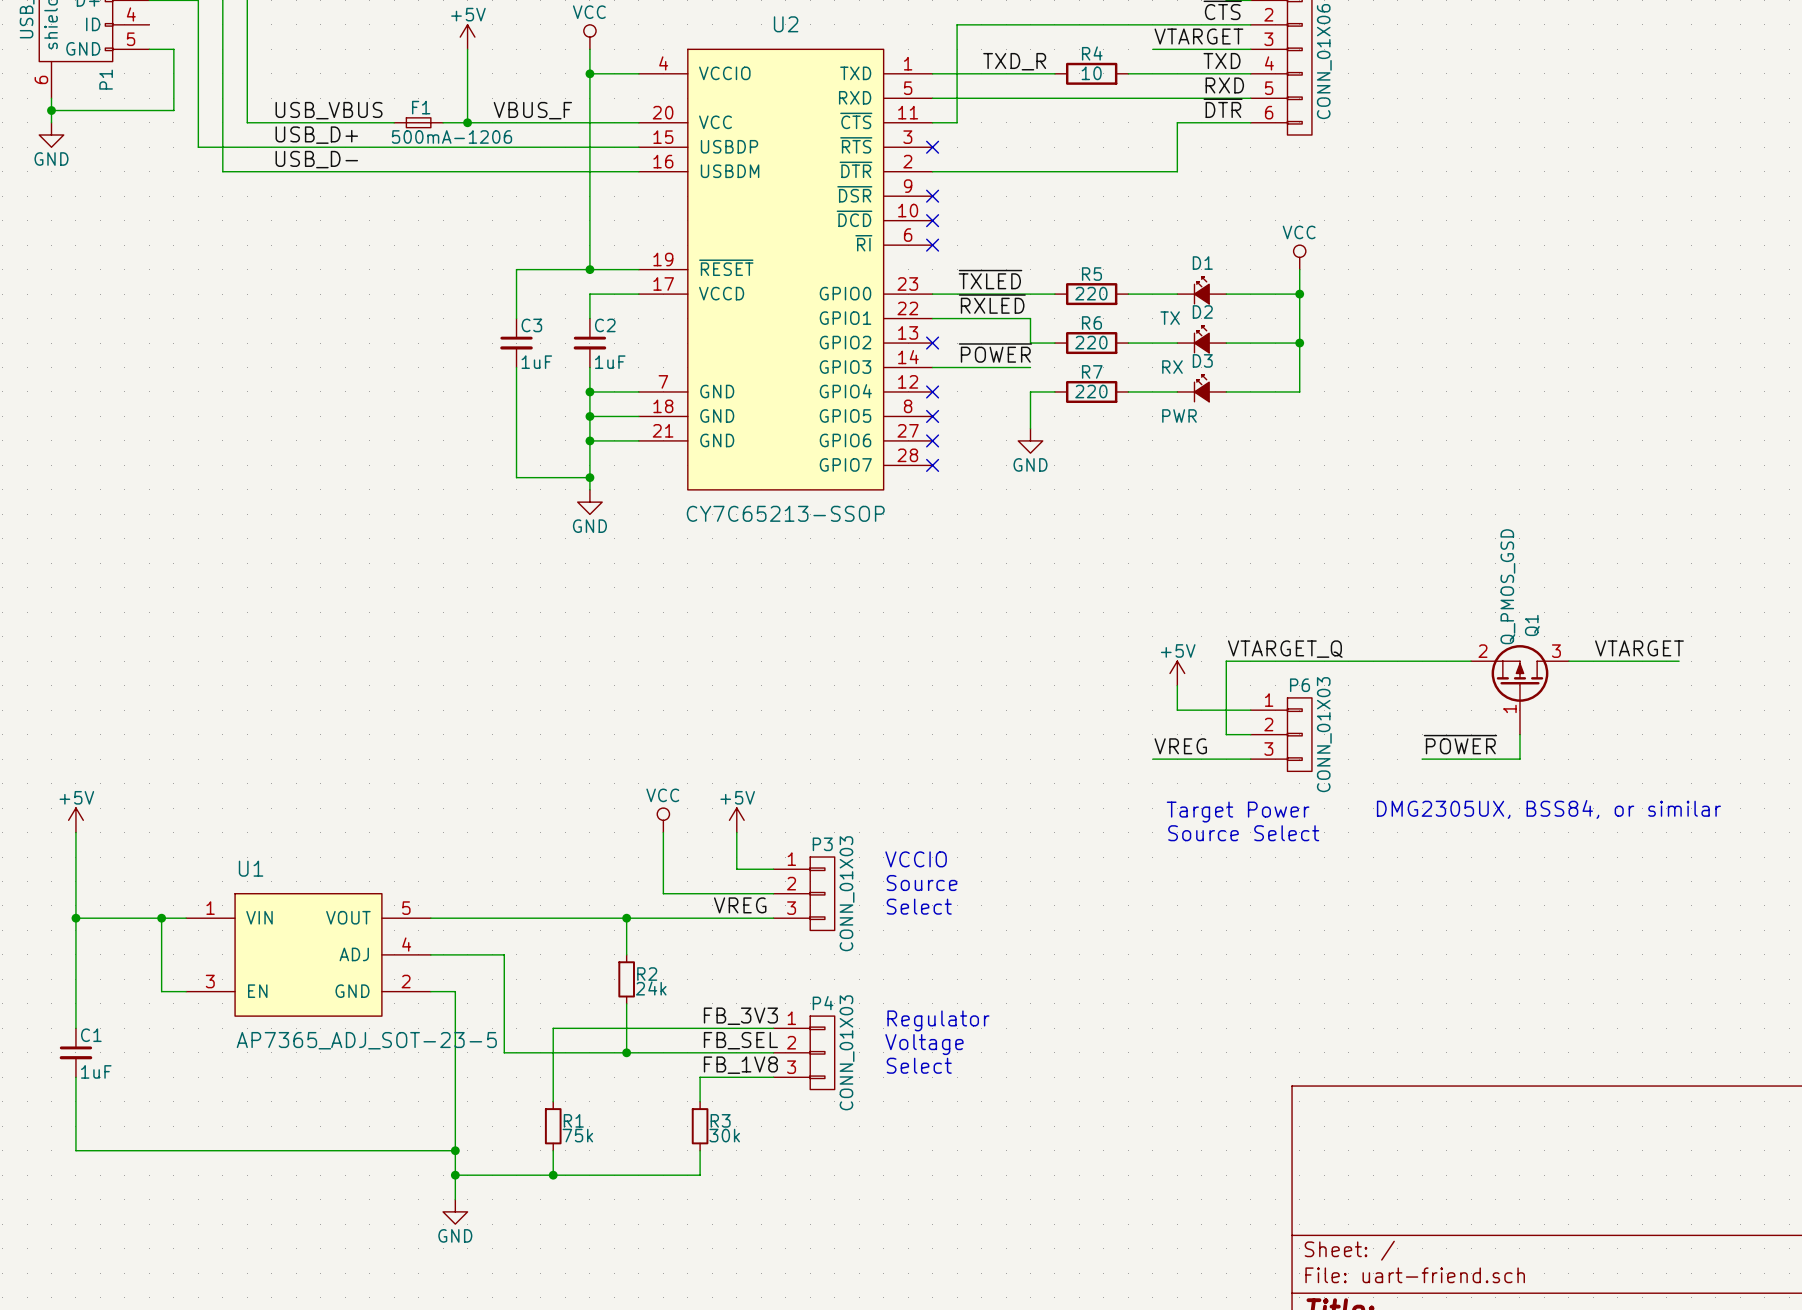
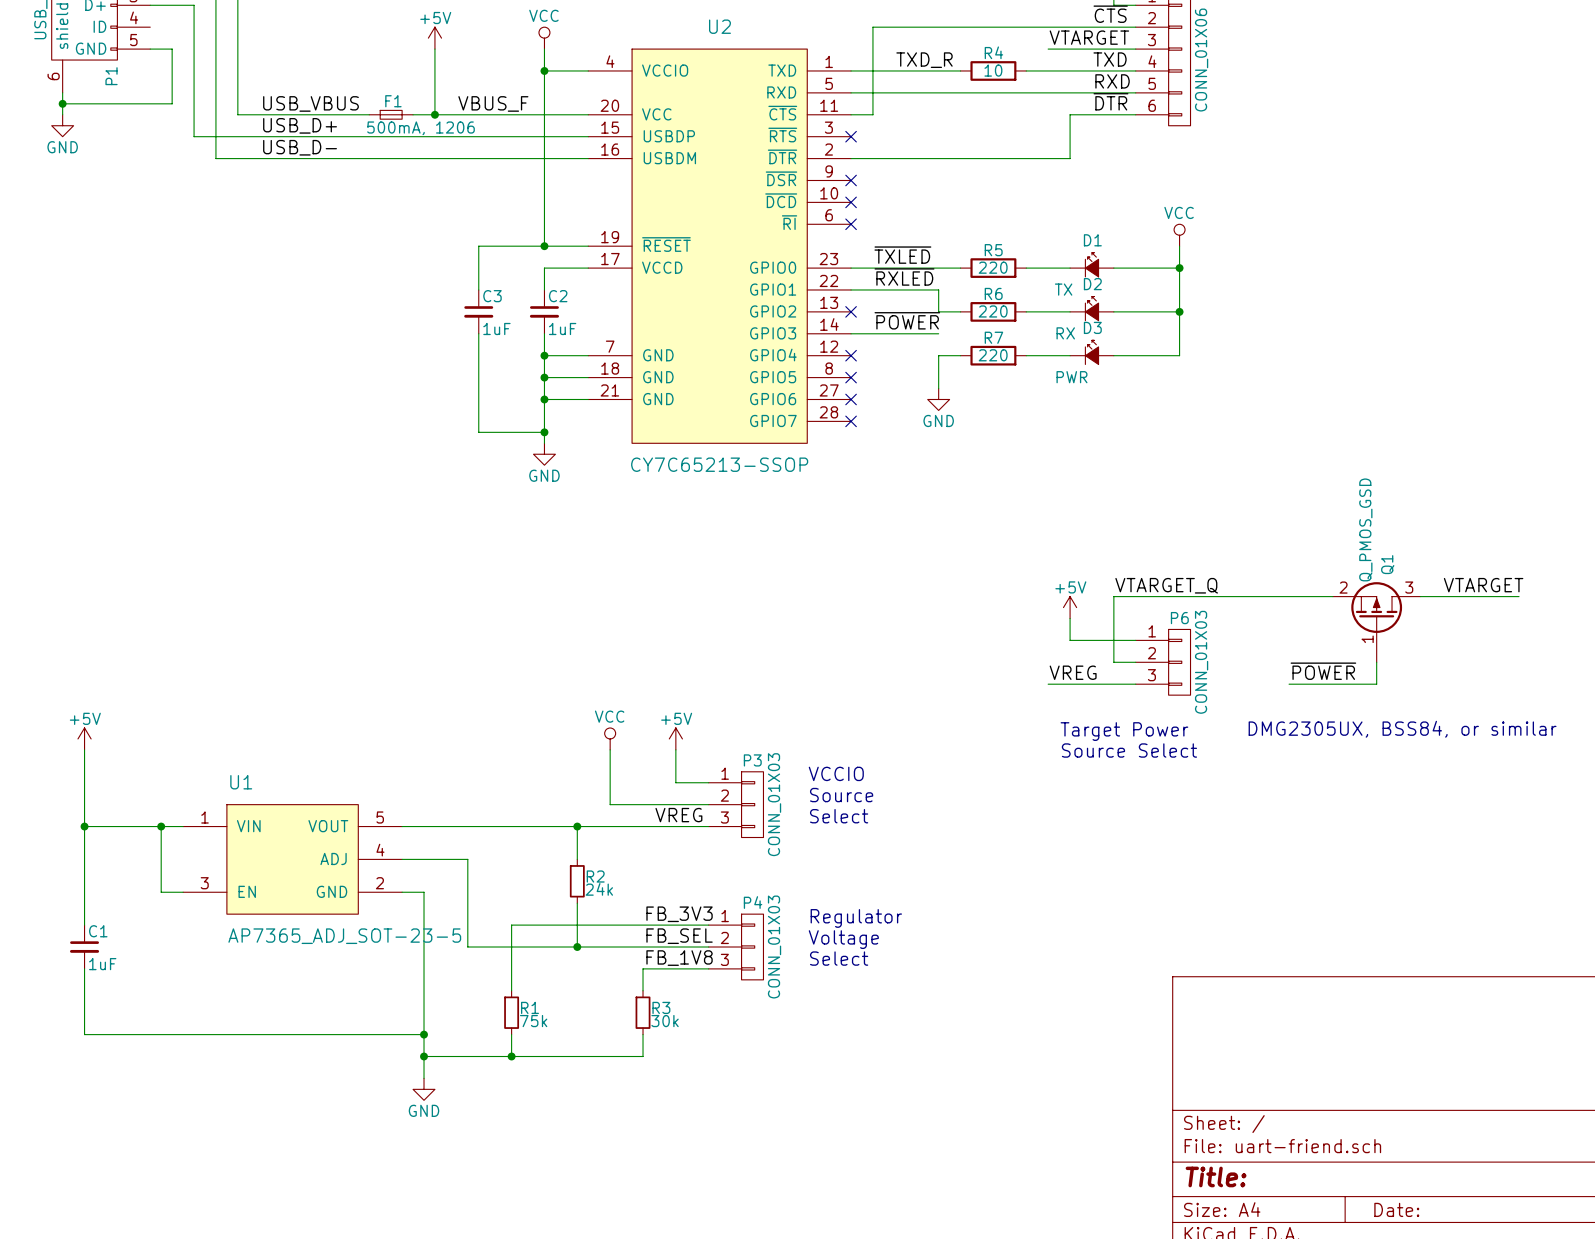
F1 value: 500mA-1206 (451, 136) -> 500mA, 1206 (421, 128)

